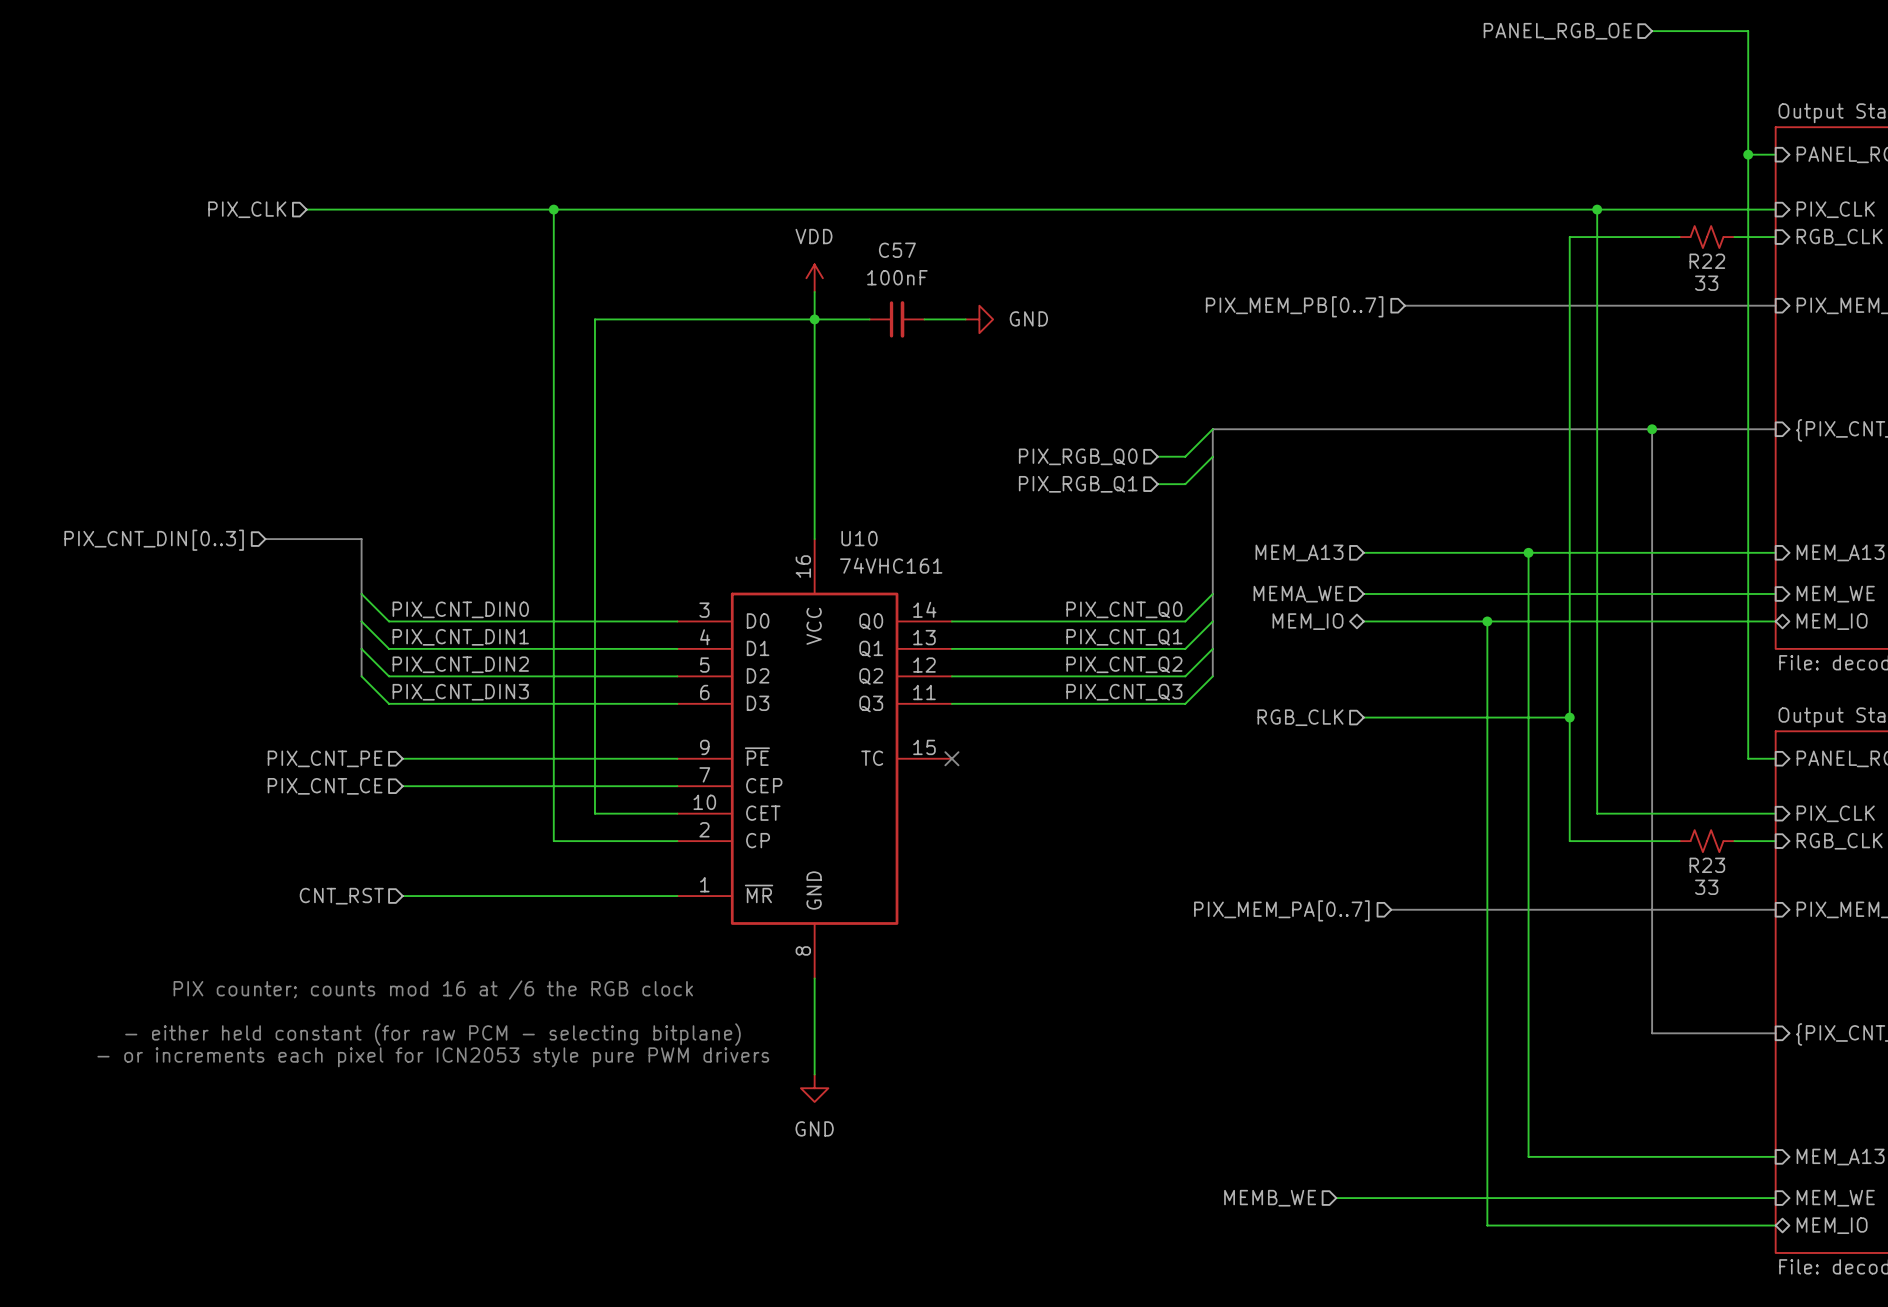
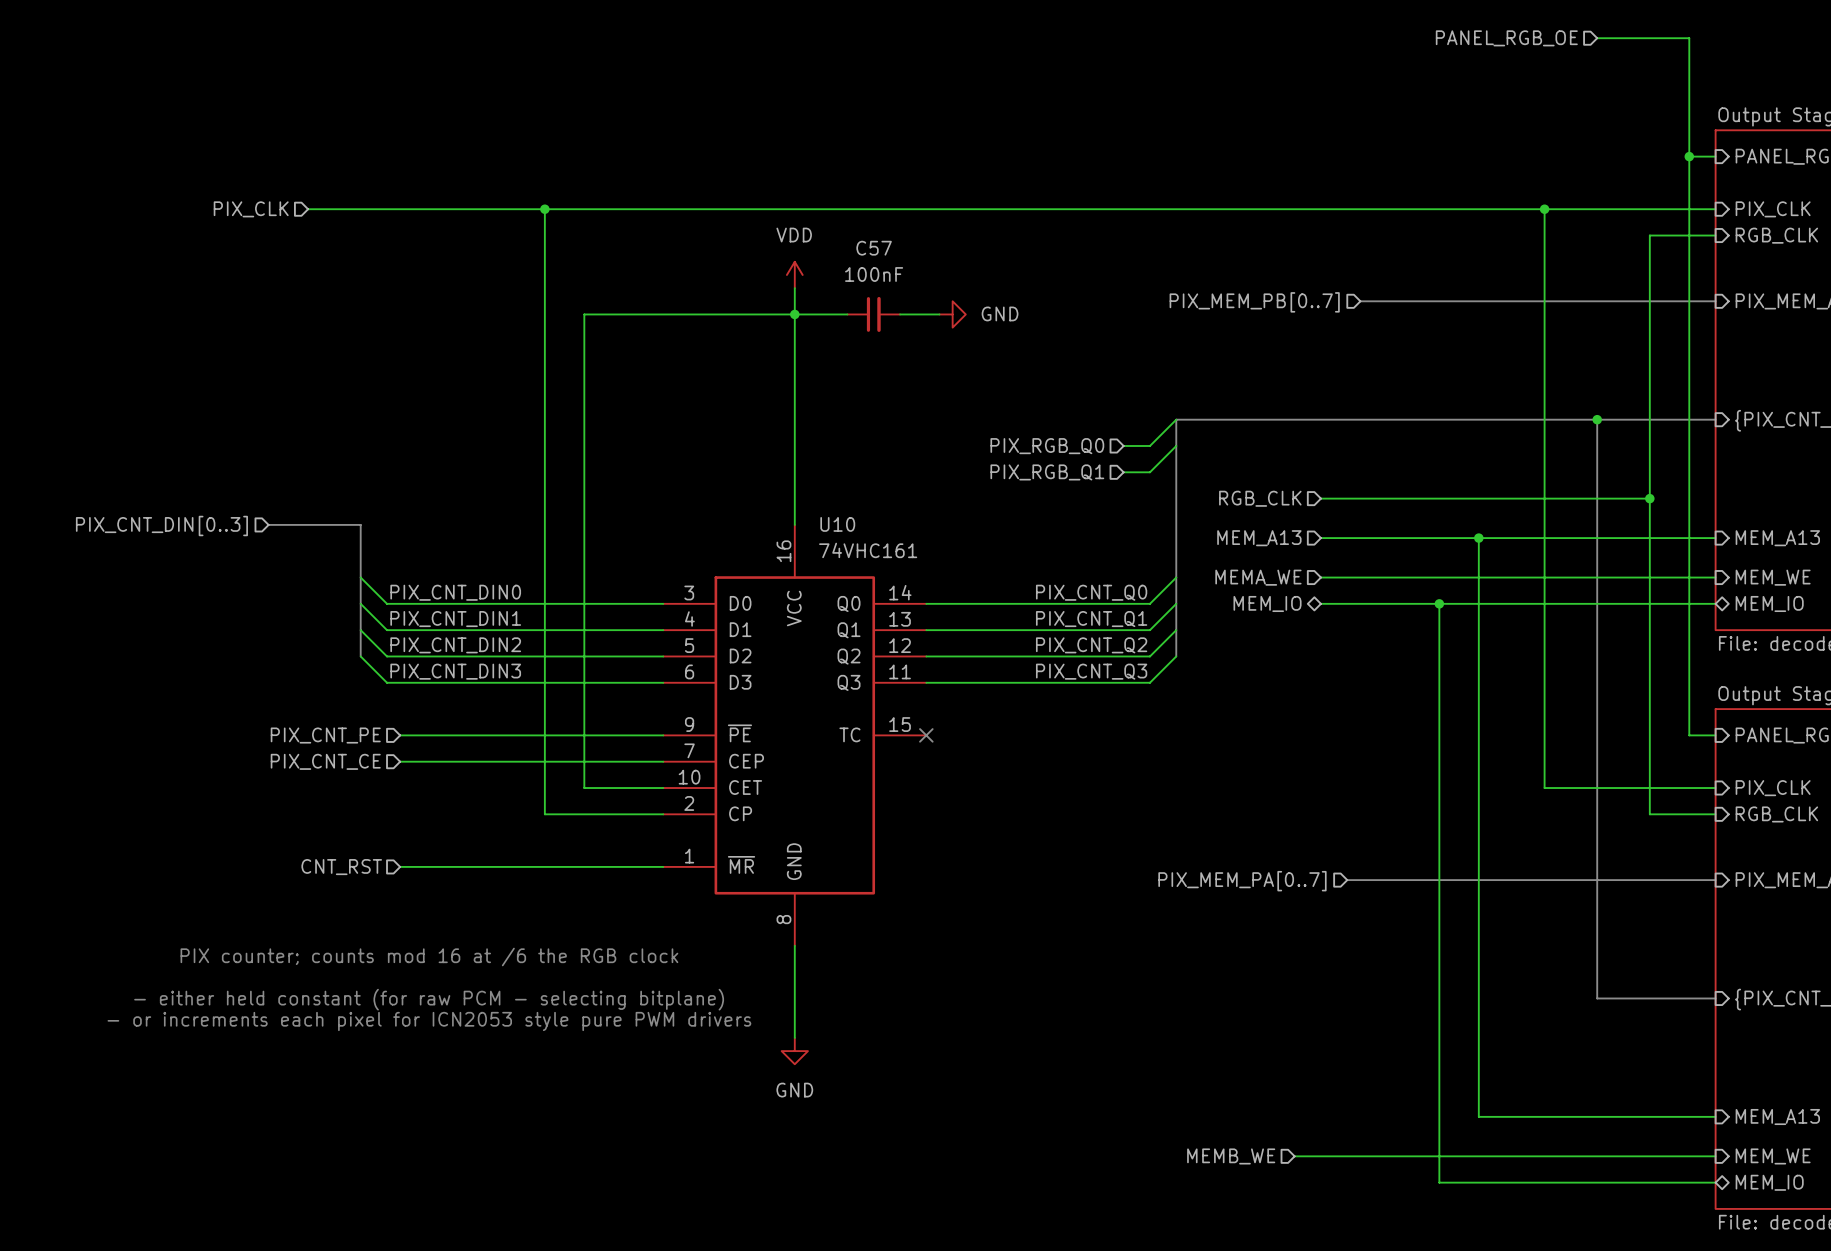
wire: (1679, 237) (1569, 237) (1569, 841) (1679, 841) -> none
R22: 33 (1707, 237) -> none
wire: none -> (1676, 235) (1649, 235) (1649, 814) (1676, 814)
wire: none -> (1320, 498) (1649, 498)
junction: none -> (1649, 498)
hierarchical label position: RGB_CLK (1300, 717) -> RGB_CLK (1260, 498)
wire: (1363, 717) (1569, 717) -> none
junction: (1569, 717) -> none
R23: 33 (1707, 841) -> none

